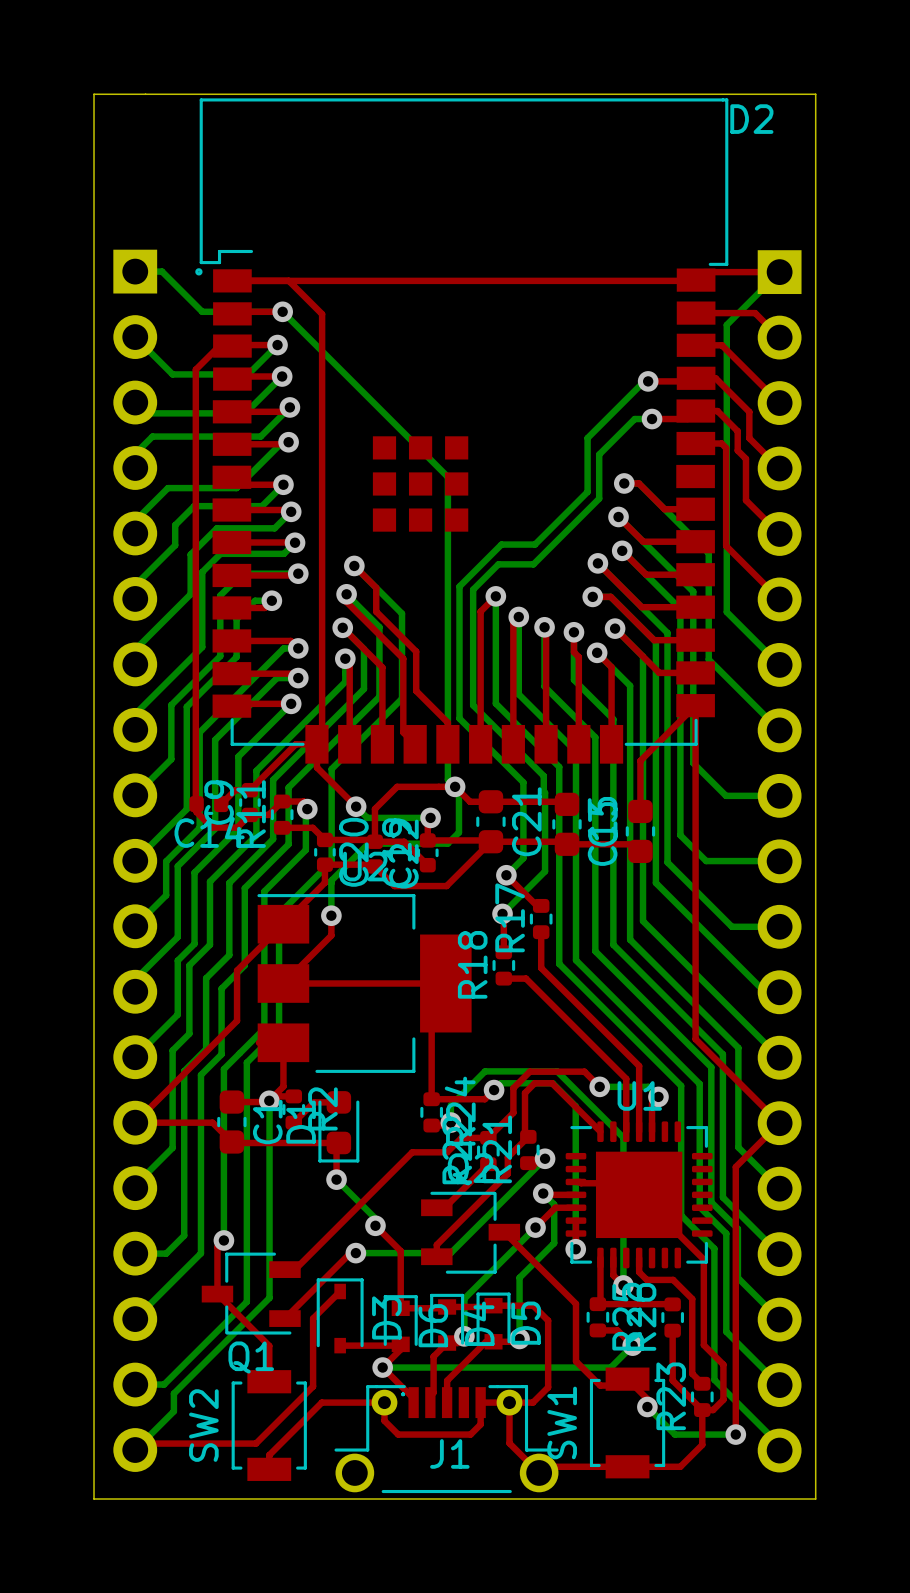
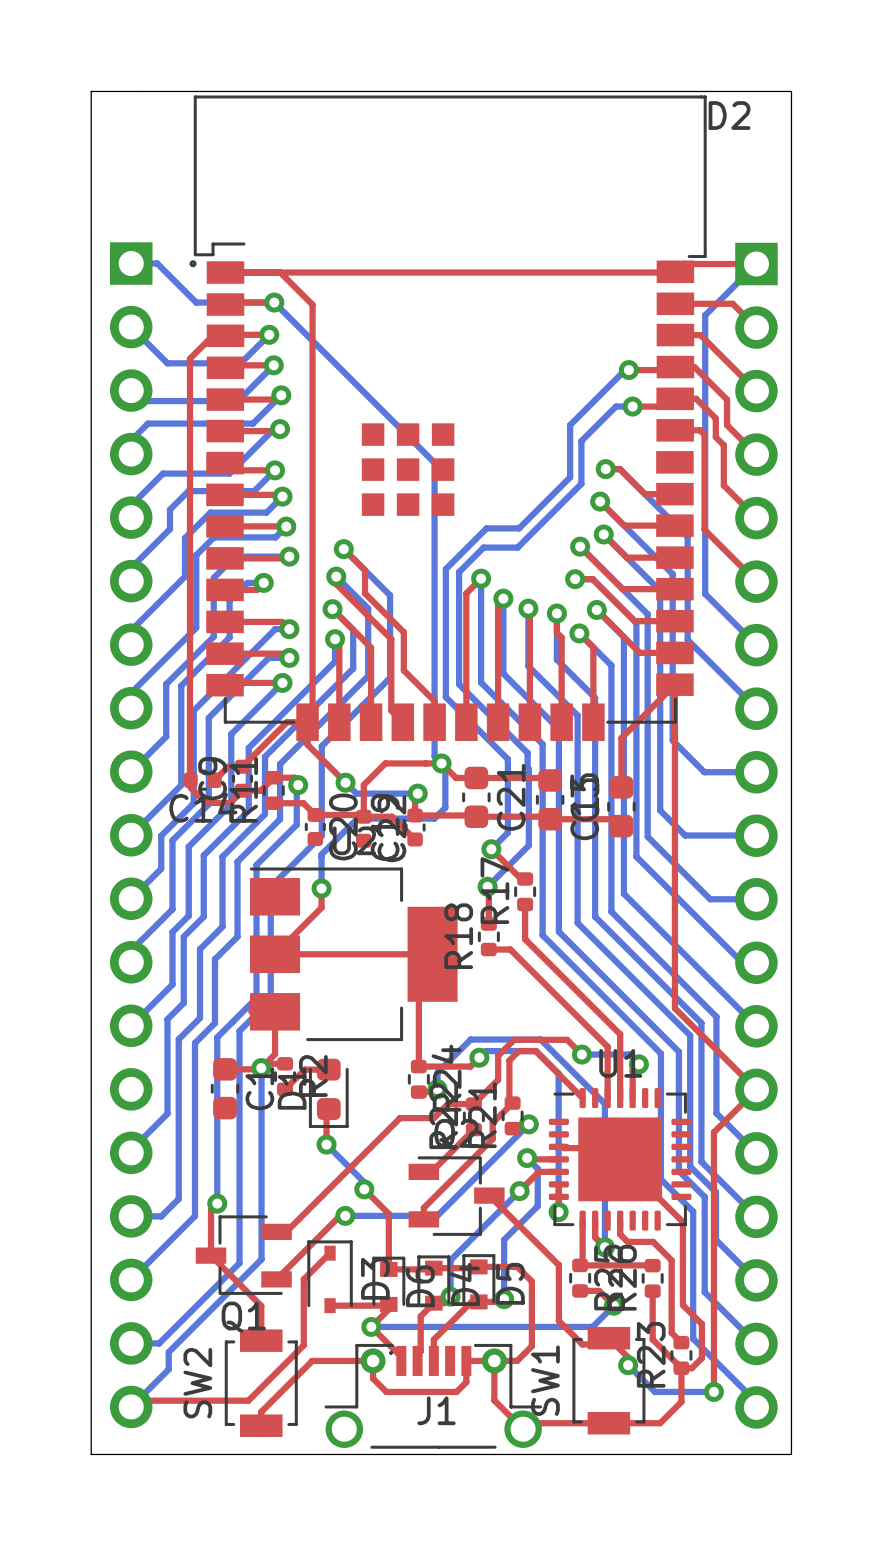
top track: (490, 841) (446, 886) (394, 886) (373, 864) (324, 864) (324, 882) (237, 970) (237, 1020) (135, 1122) (212, 1122) (232, 1142) (338, 1142) -> none

